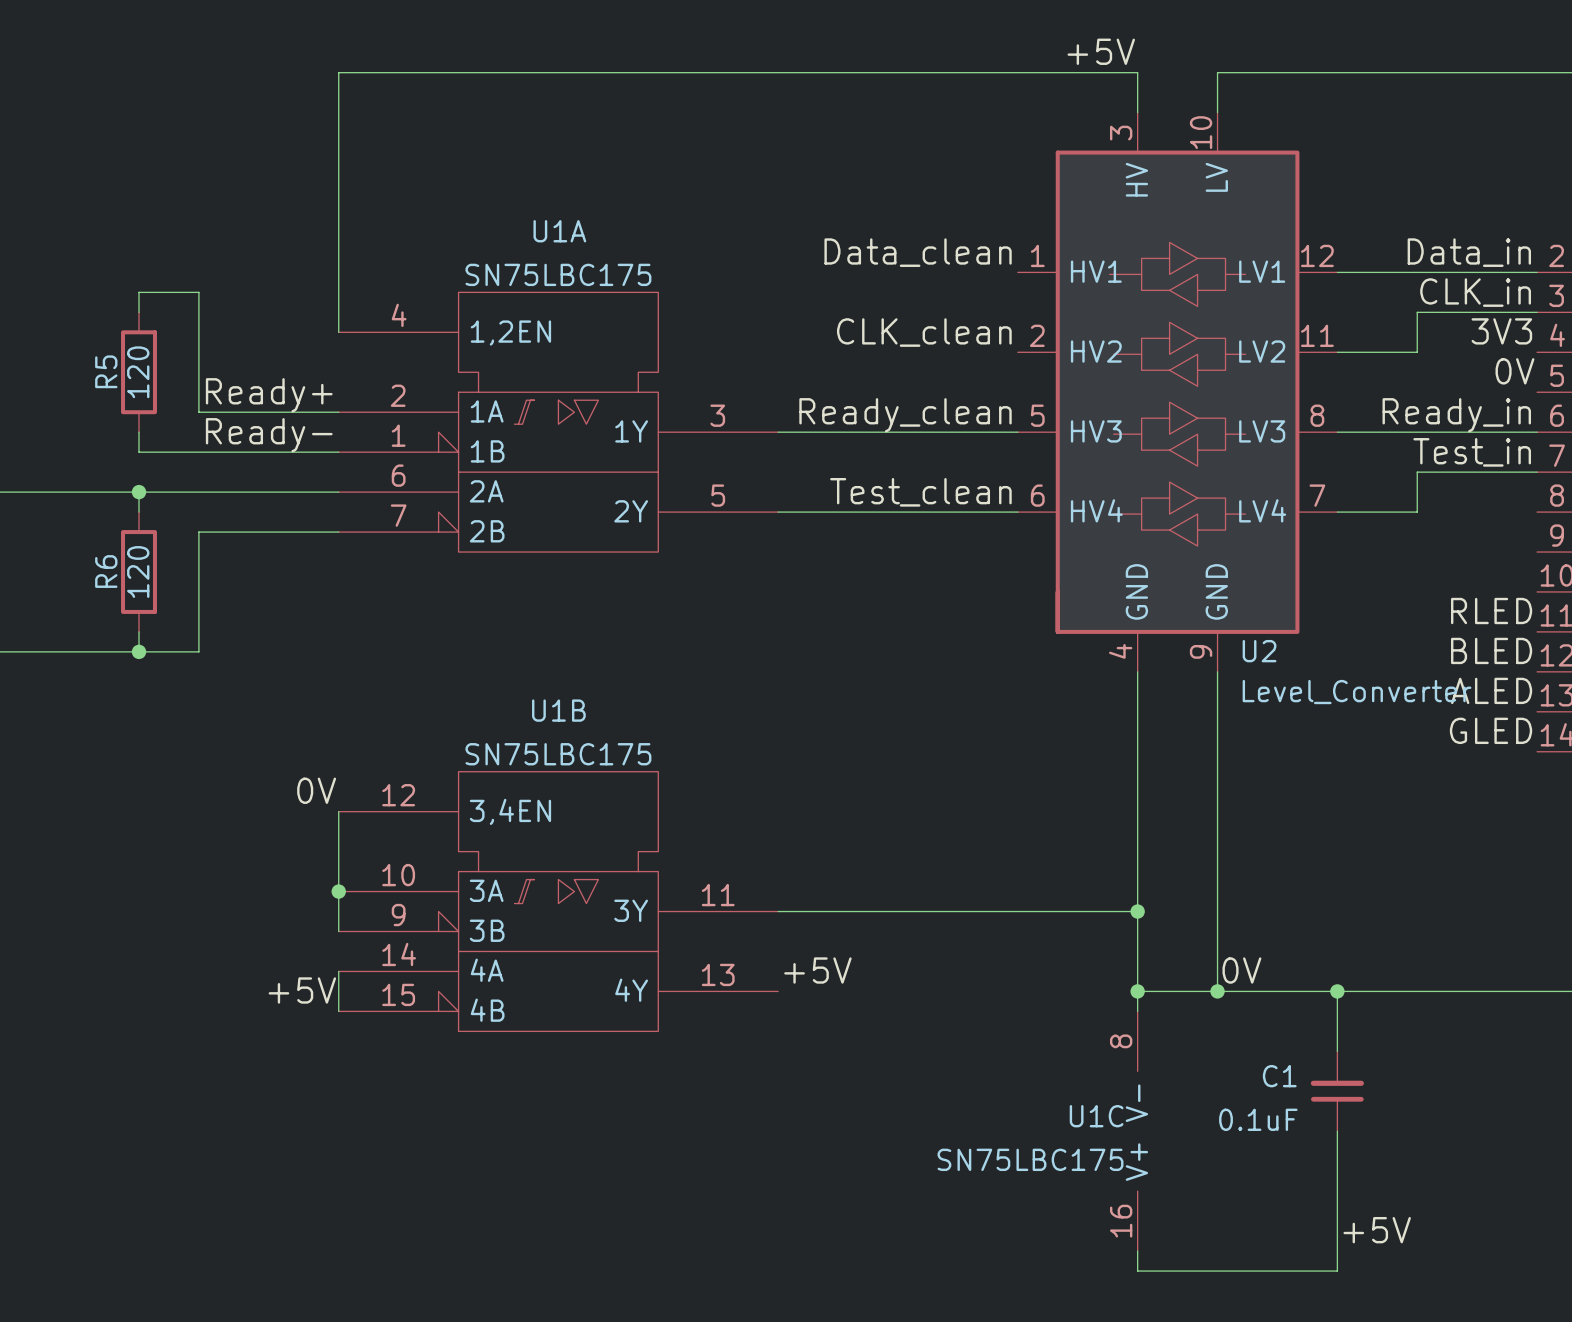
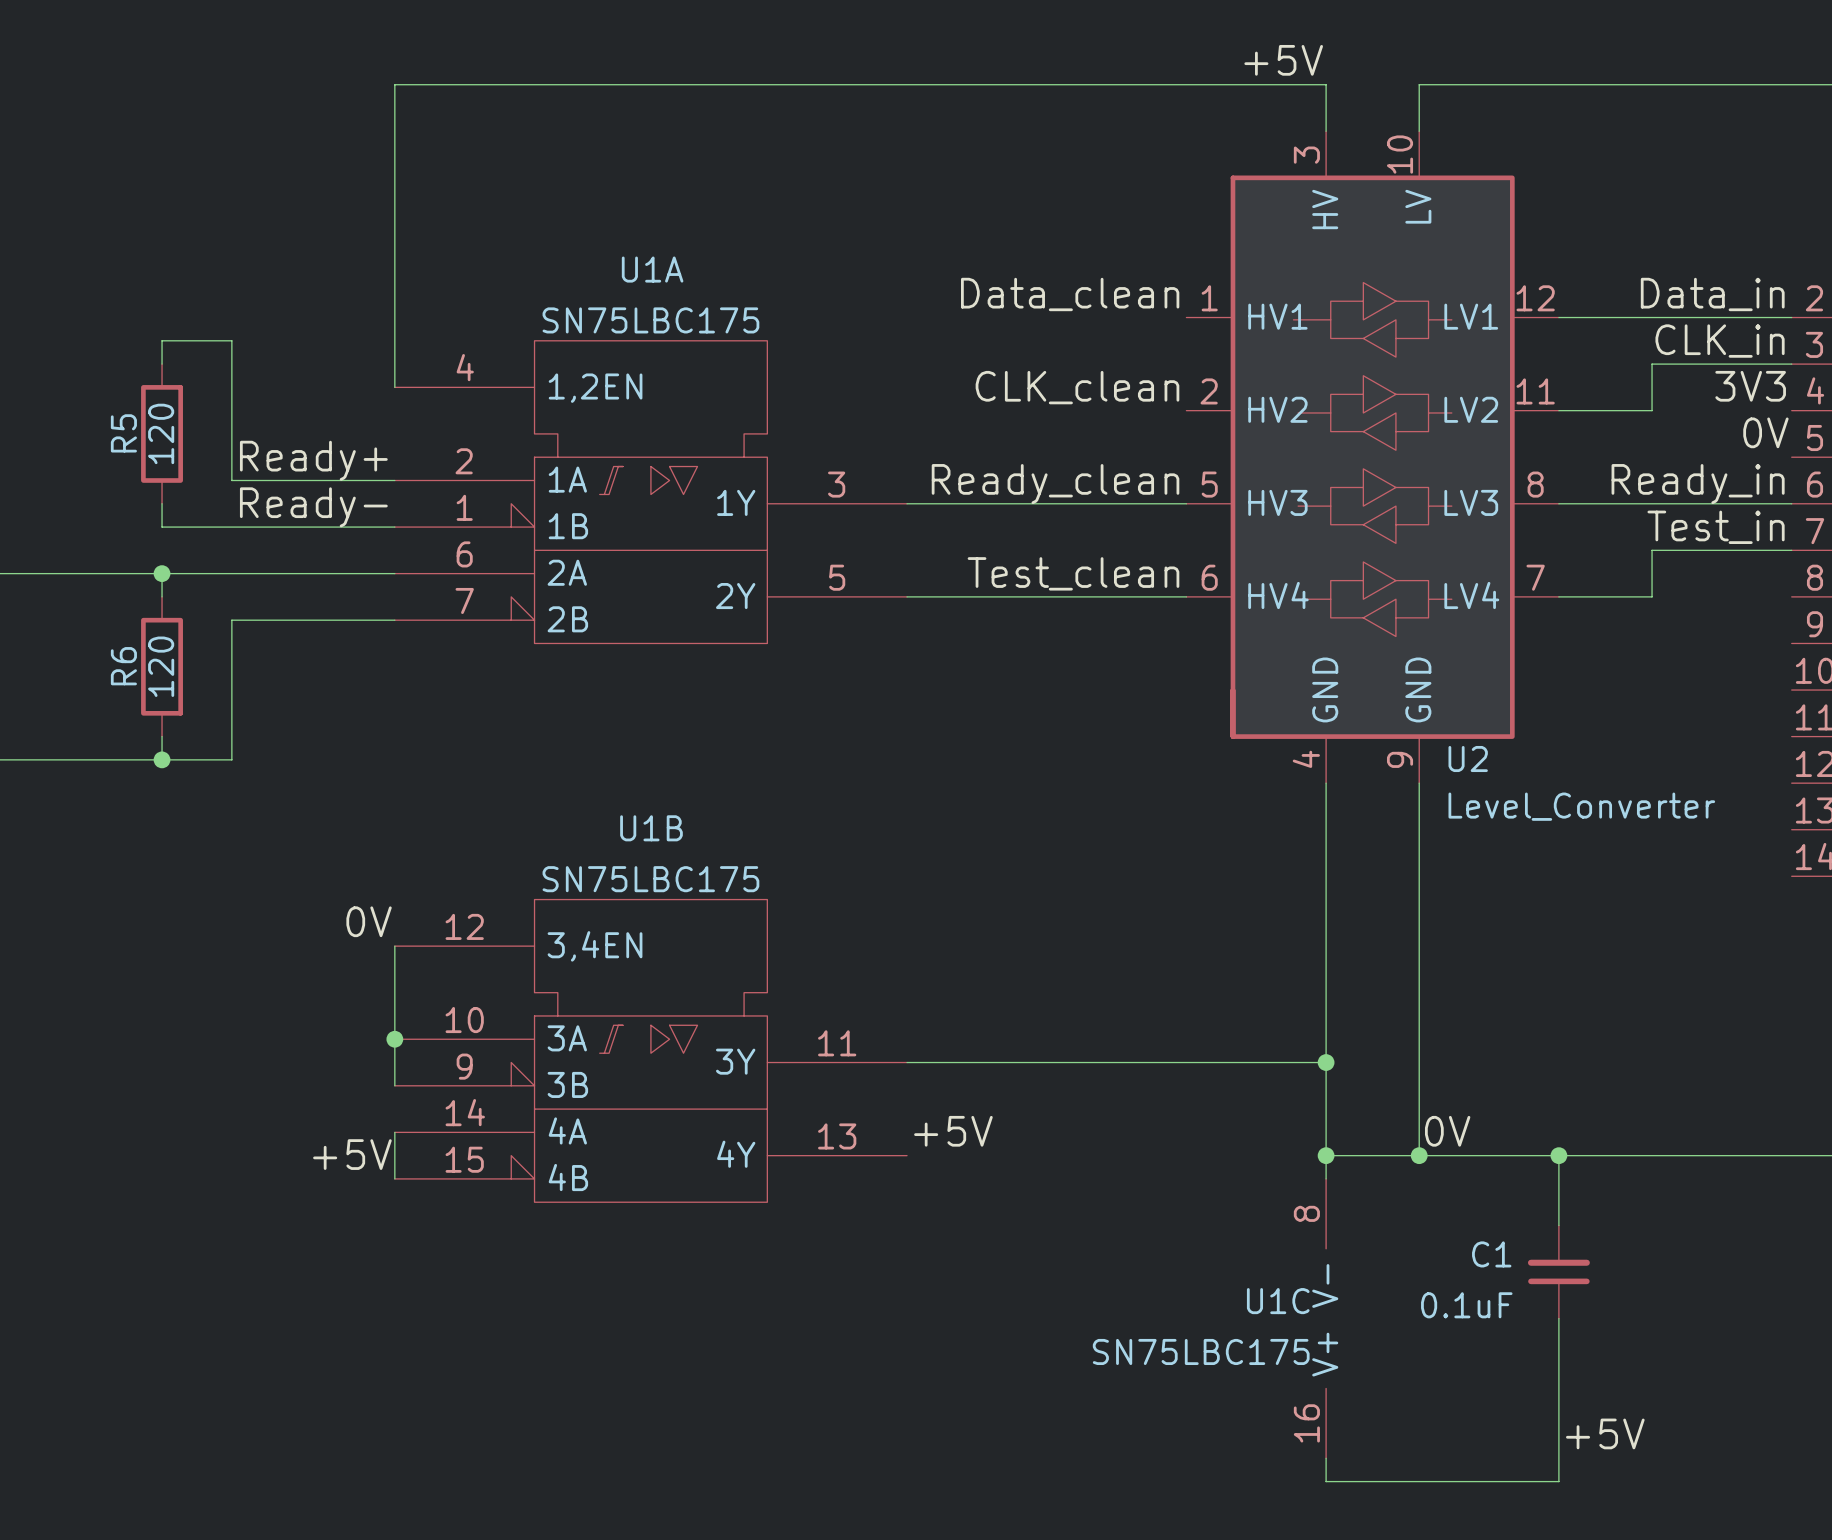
label: RLED (1491, 611) -> none
label: BLED (1491, 650) -> none
label: ALED (1491, 690) -> none
label: GLED (1491, 730) -> none

